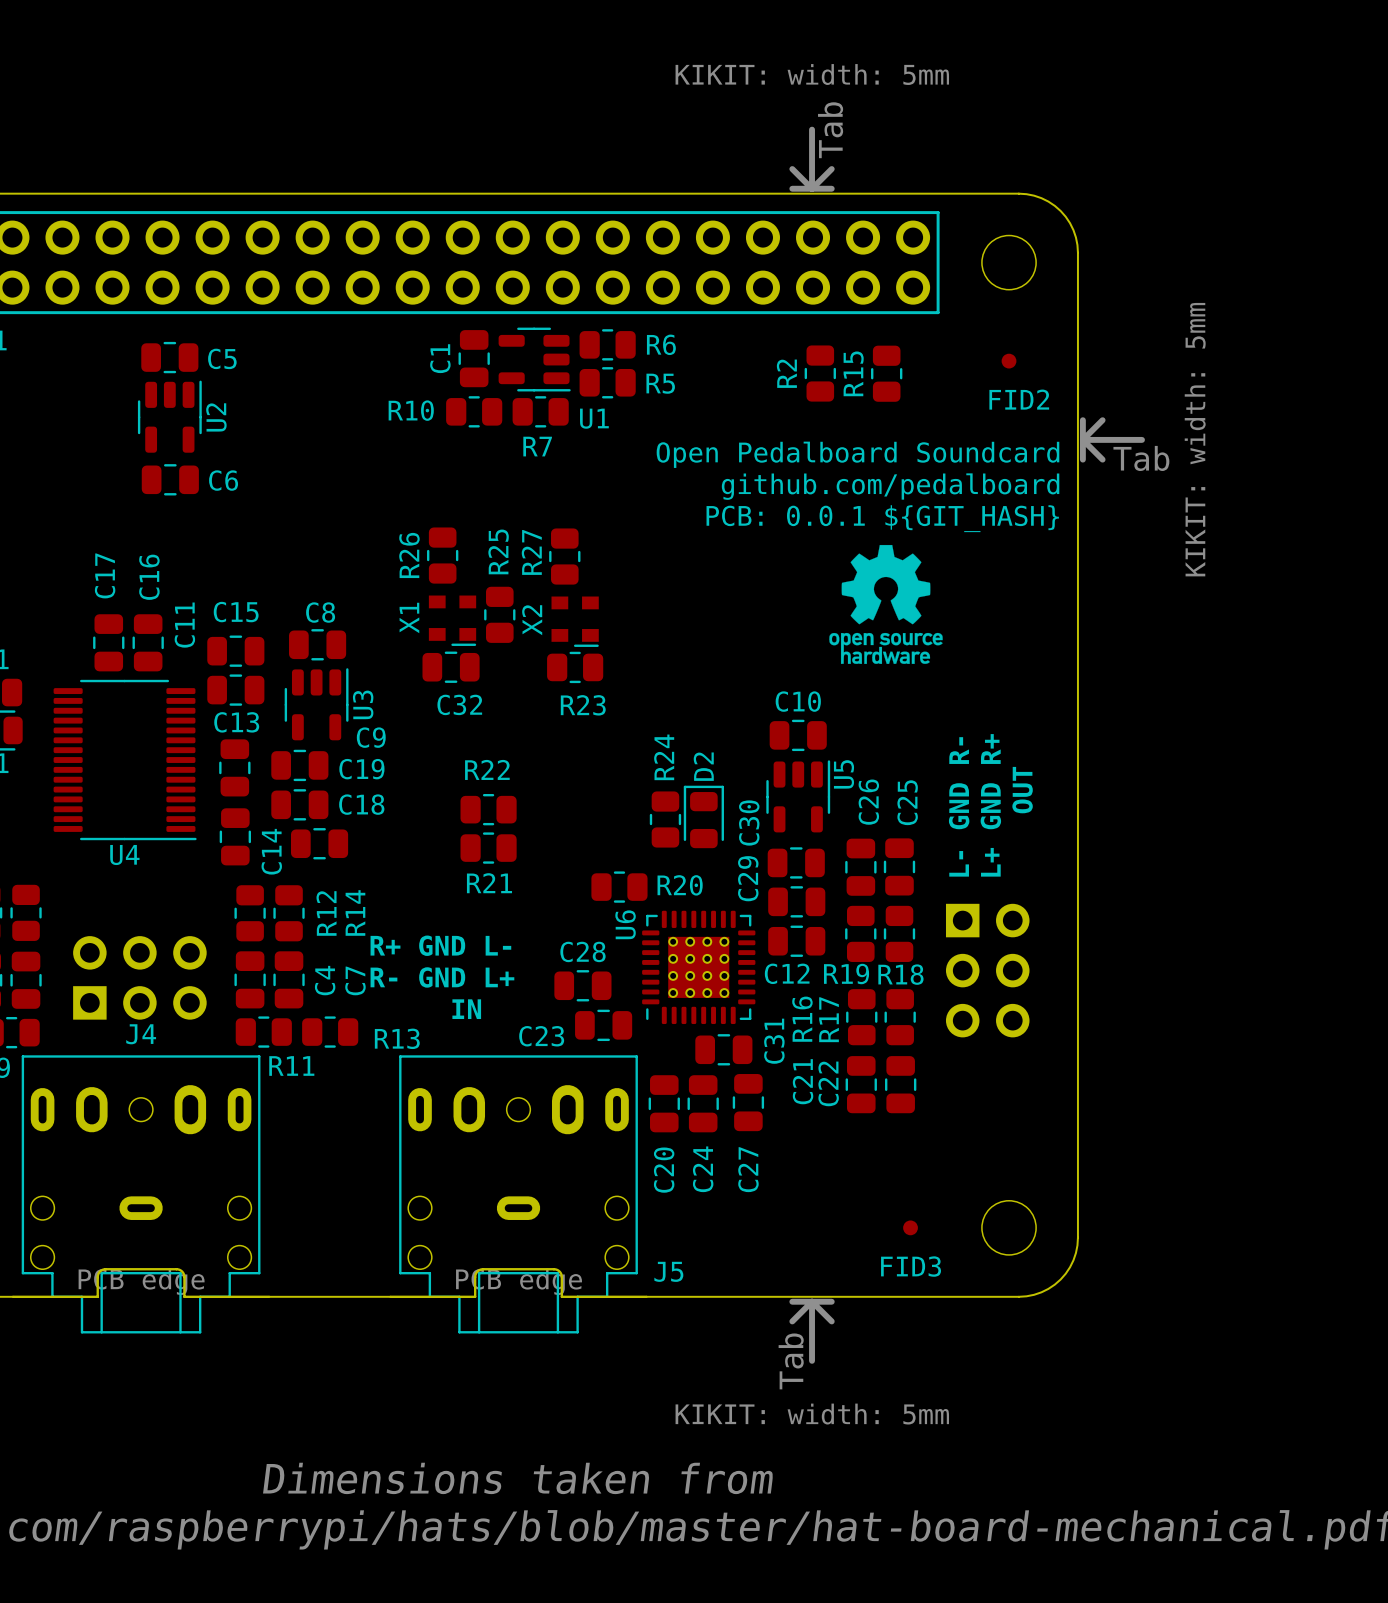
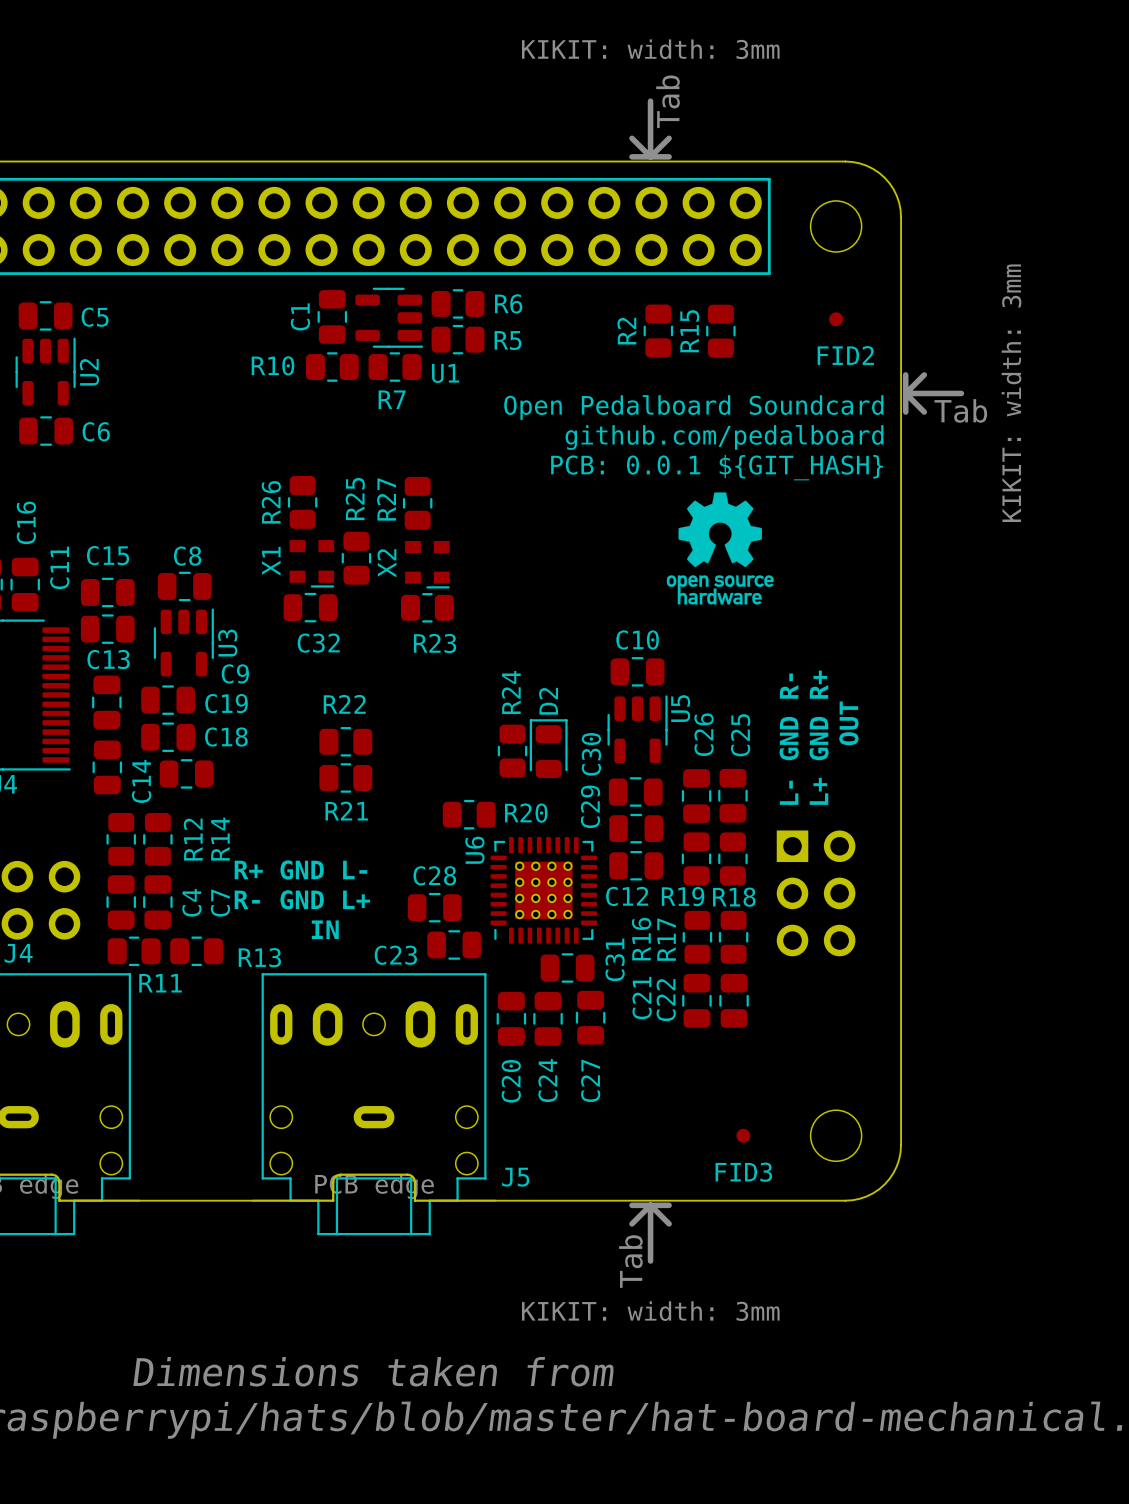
drawing shape: [675, 64, 950, 192] -> [522, 39, 780, 160]
drawing shape: [1079, 302, 1206, 577] -> [902, 264, 1022, 523]
drawing shape: [675, 1298, 950, 1425] -> [522, 1202, 780, 1321]

